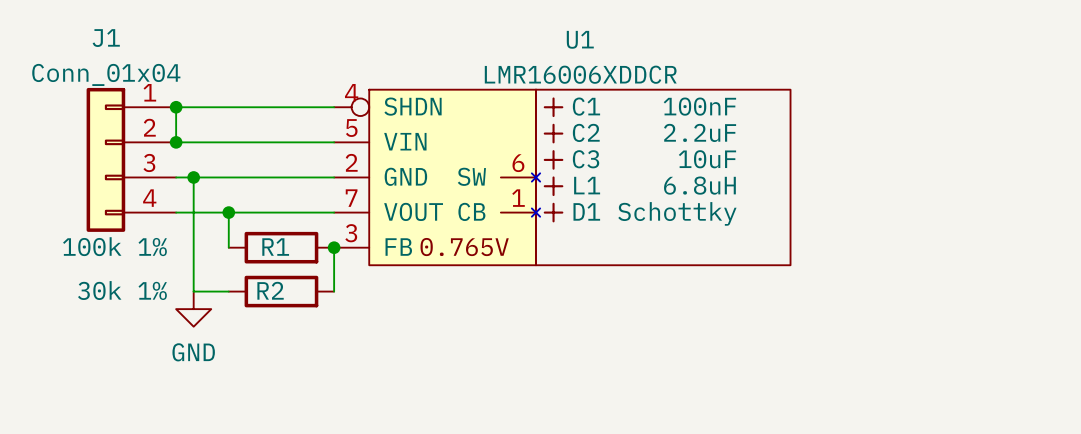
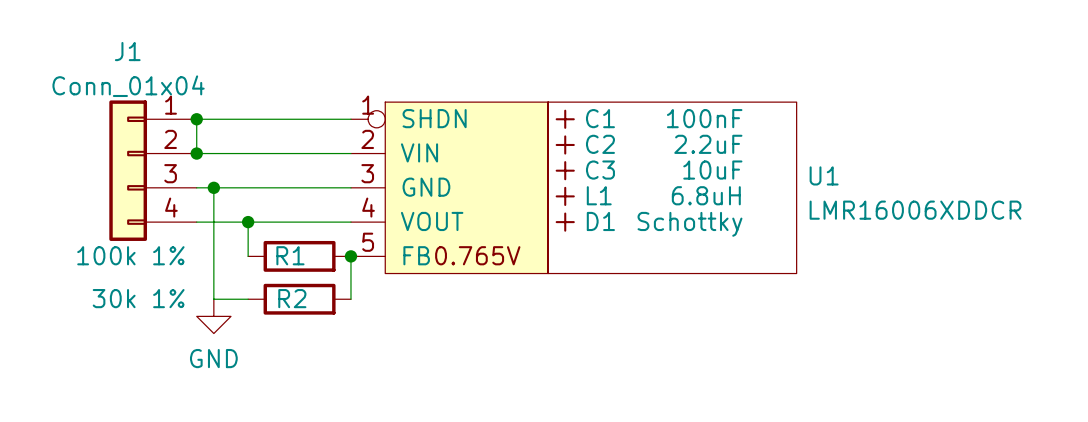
U1 name position: U1 (580, 39) -> U1 (824, 175)
U1 value position: LMR16006XDDCR (580, 74) -> LMR16006XDDCR (915, 210)
U1 symbol: [334, 89, 791, 266] -> [350, 102, 797, 274]

